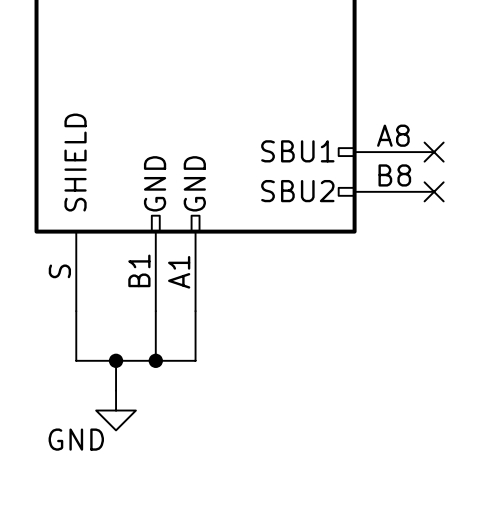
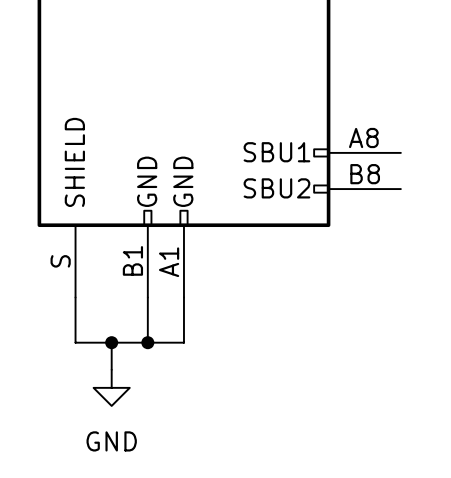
no-connect mark: (434, 152) -> none
no-connect mark: (434, 191) -> none
power symbol text position: GND (76, 439) -> GND (111, 441)

